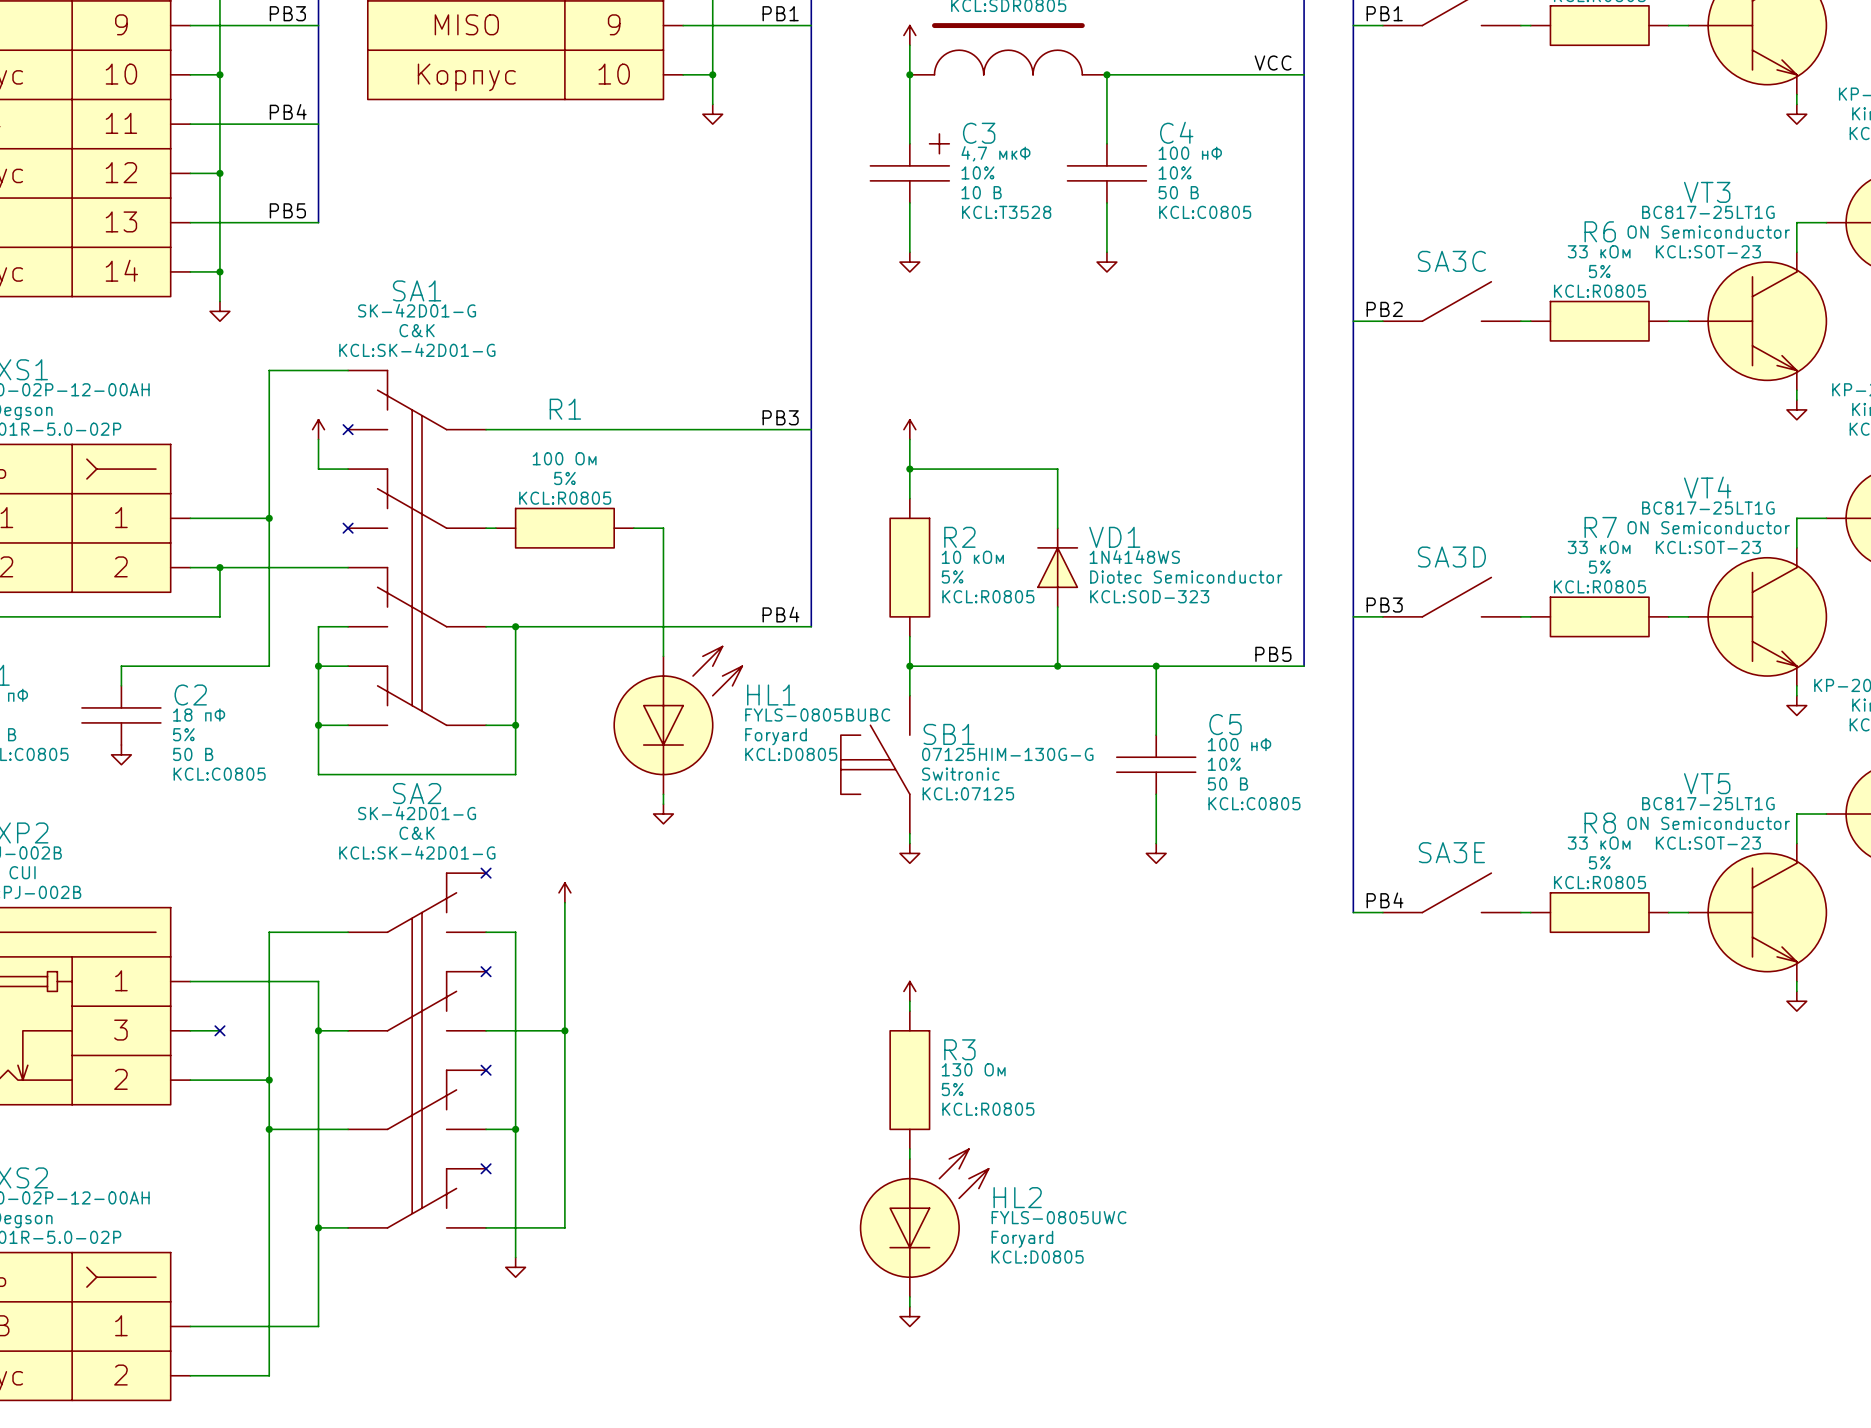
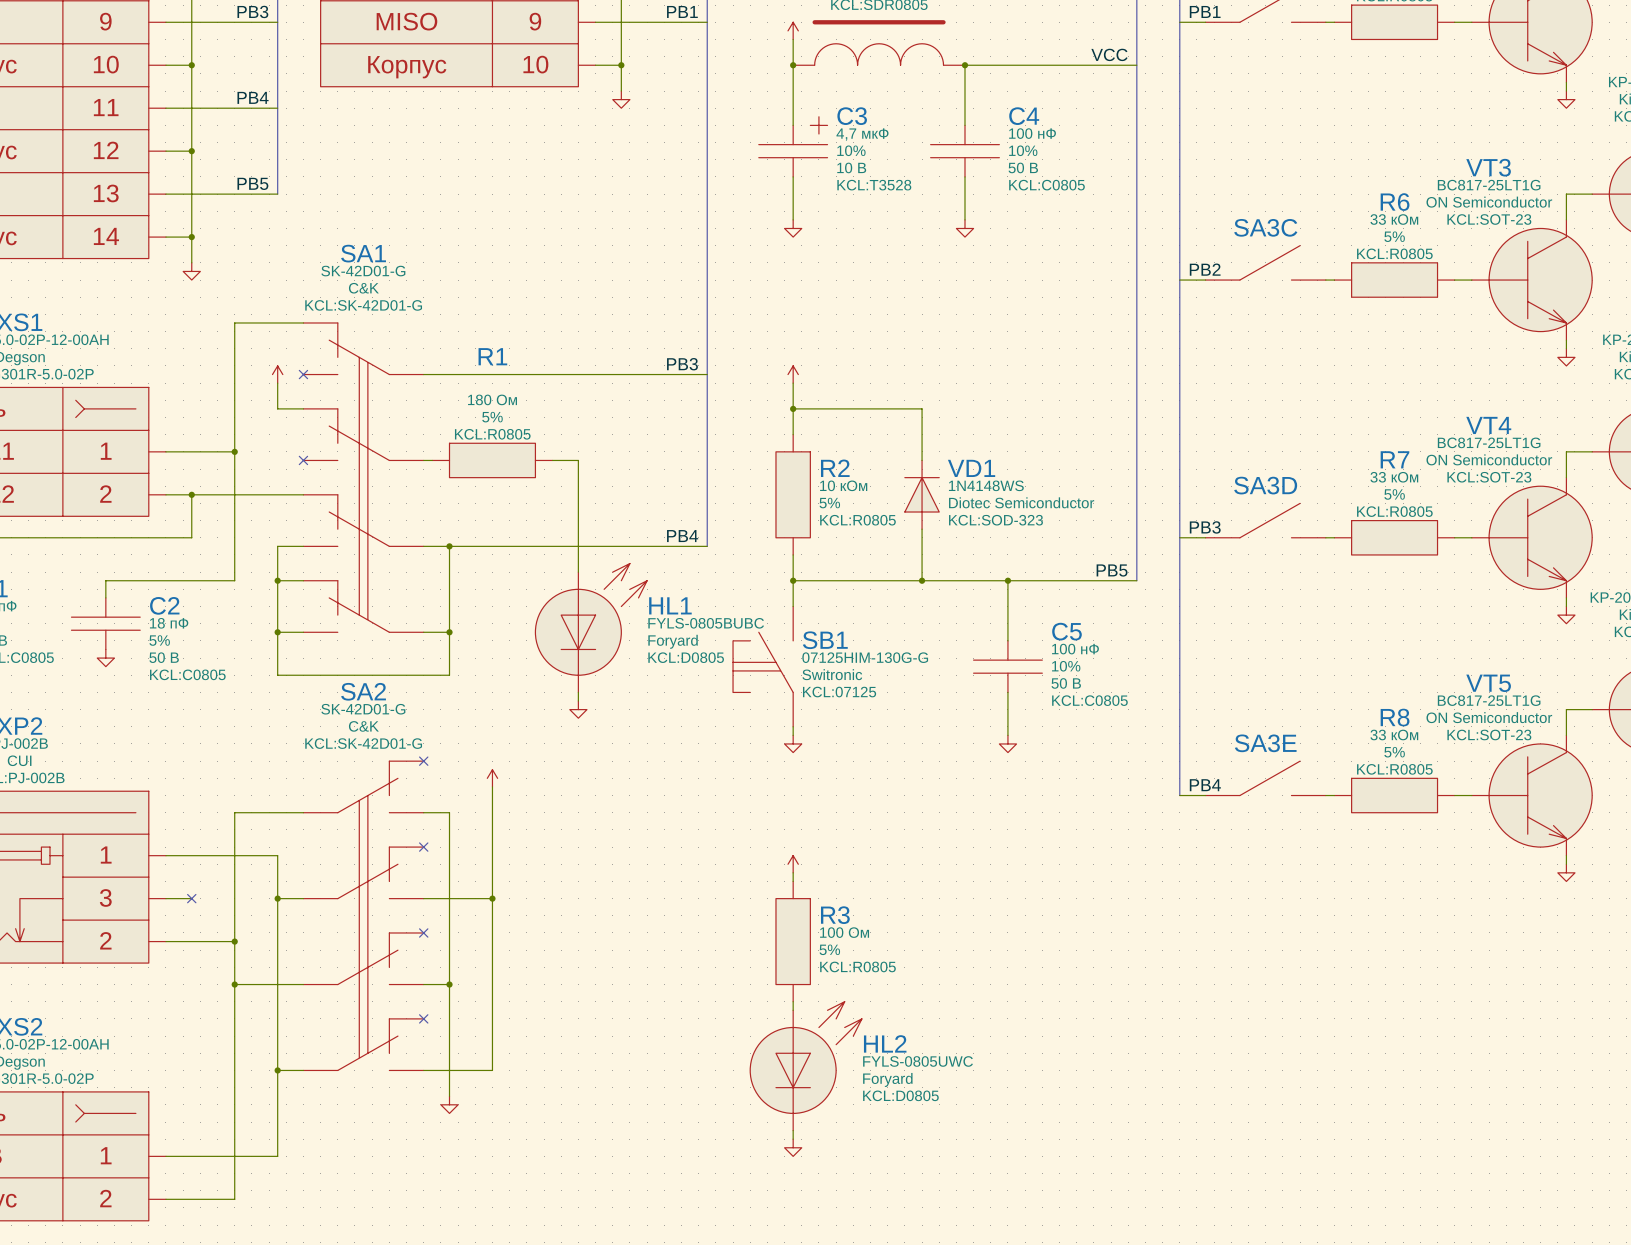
R1 text: 100 Ом (564, 458) -> 180 Ом (492, 399)
R3 text: 130 Ом (973, 1069) -> 100 Ом (844, 932)

